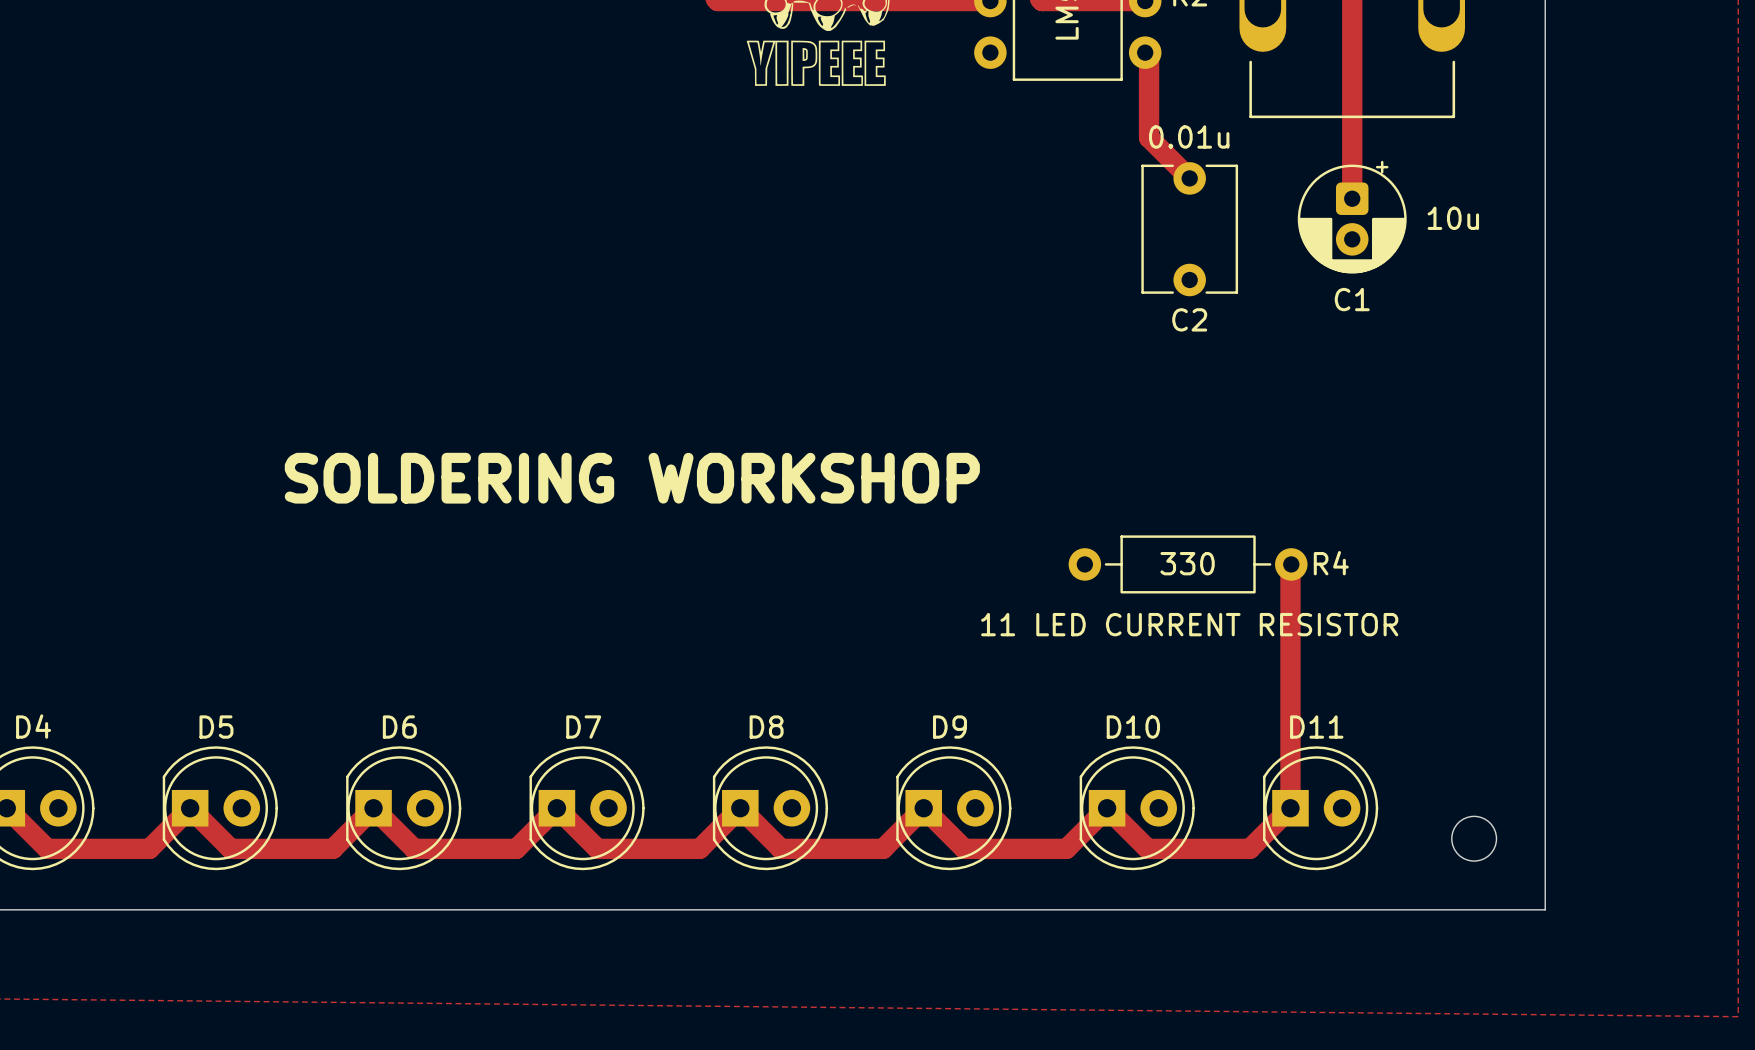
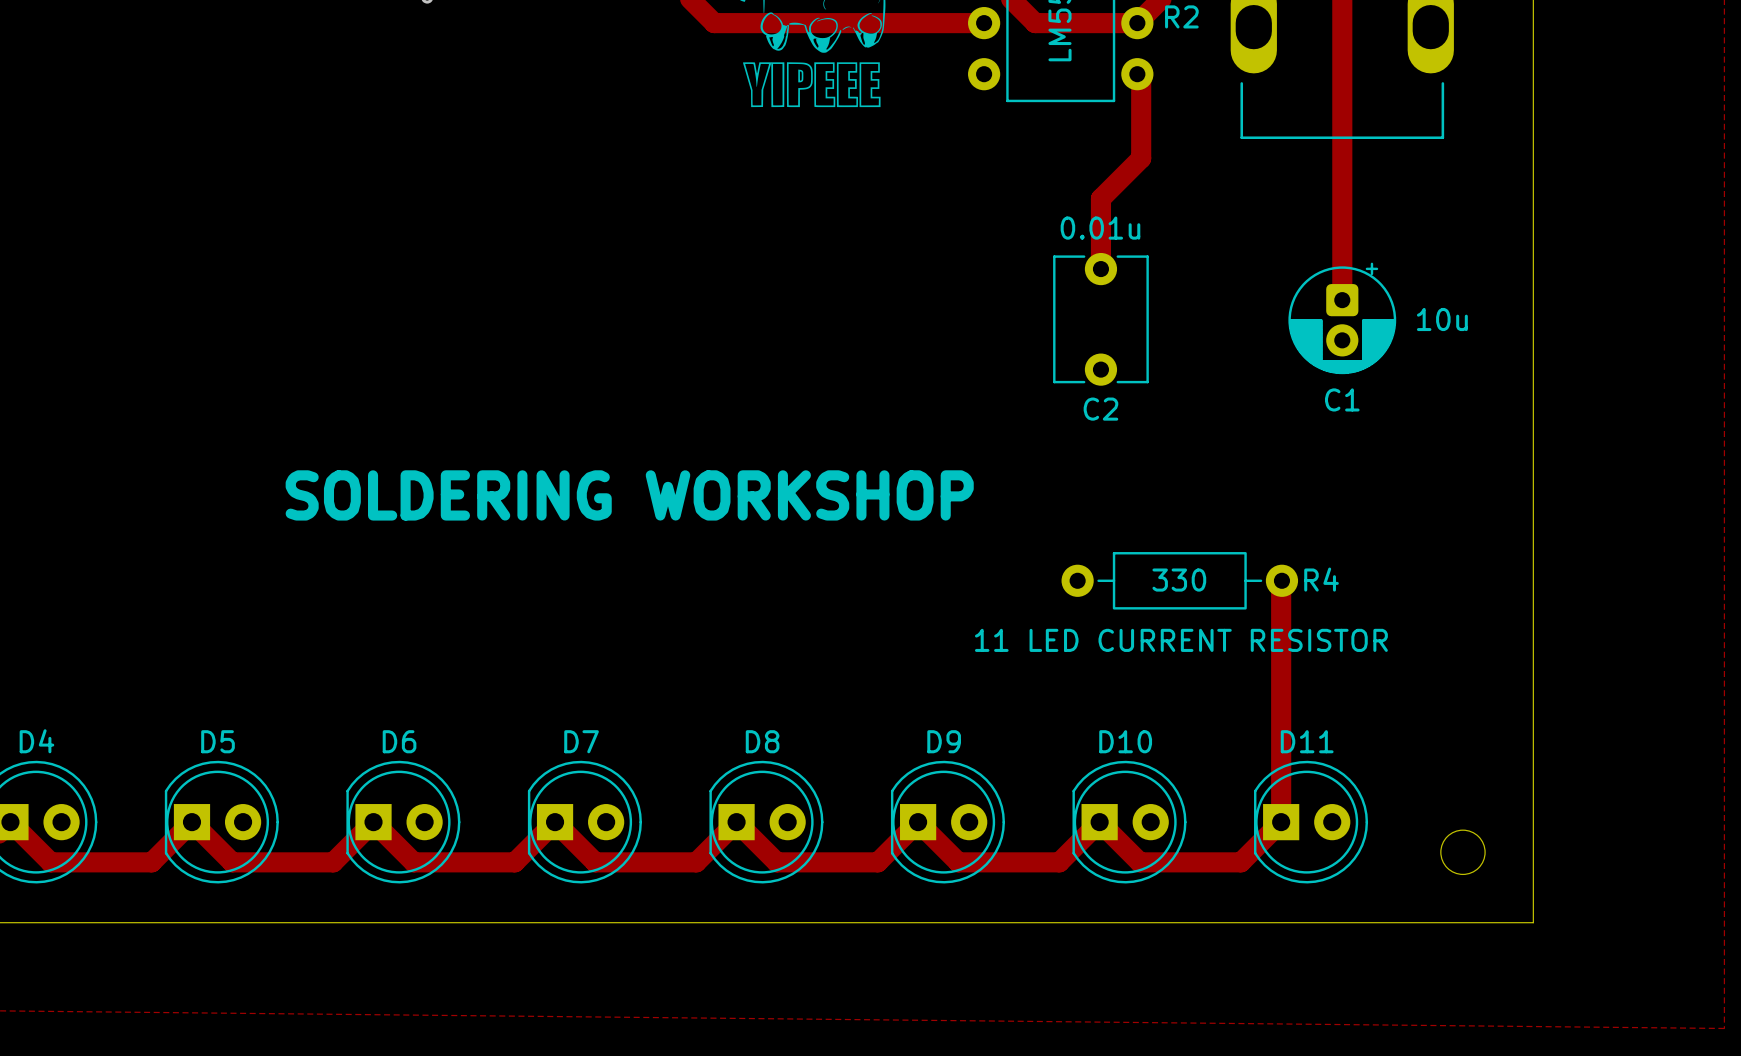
track: (1149, 137) (1189, 178) -> (1141, 158) (1100, 198) (1100, 269)
track: none -> (1342, 218) (1342, 300)
C1 position: (1352, 217) -> (1342, 318)
C2 position: (1189, 229) -> (1100, 319)

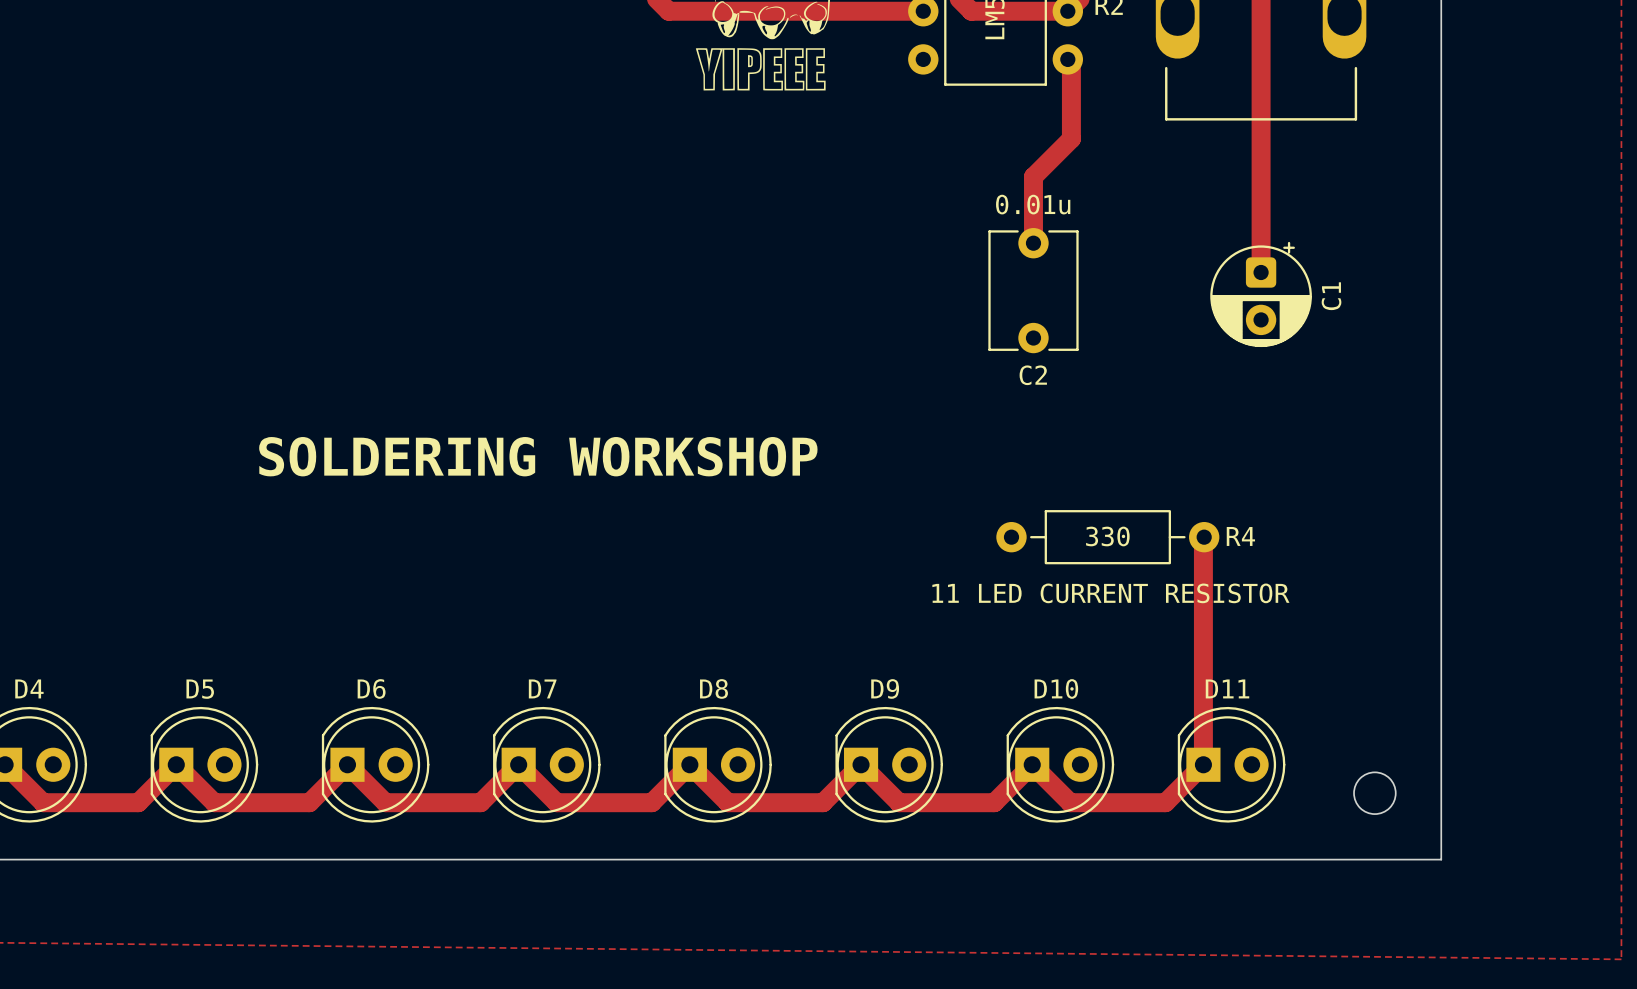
C1 footprint: [1288, 262, 1397, 375] -> [1210, 241, 1312, 348]
C1 value: 10u (1442, 319) -> none
C1 name position: C1 (1342, 399) -> C1 (1331, 296)

